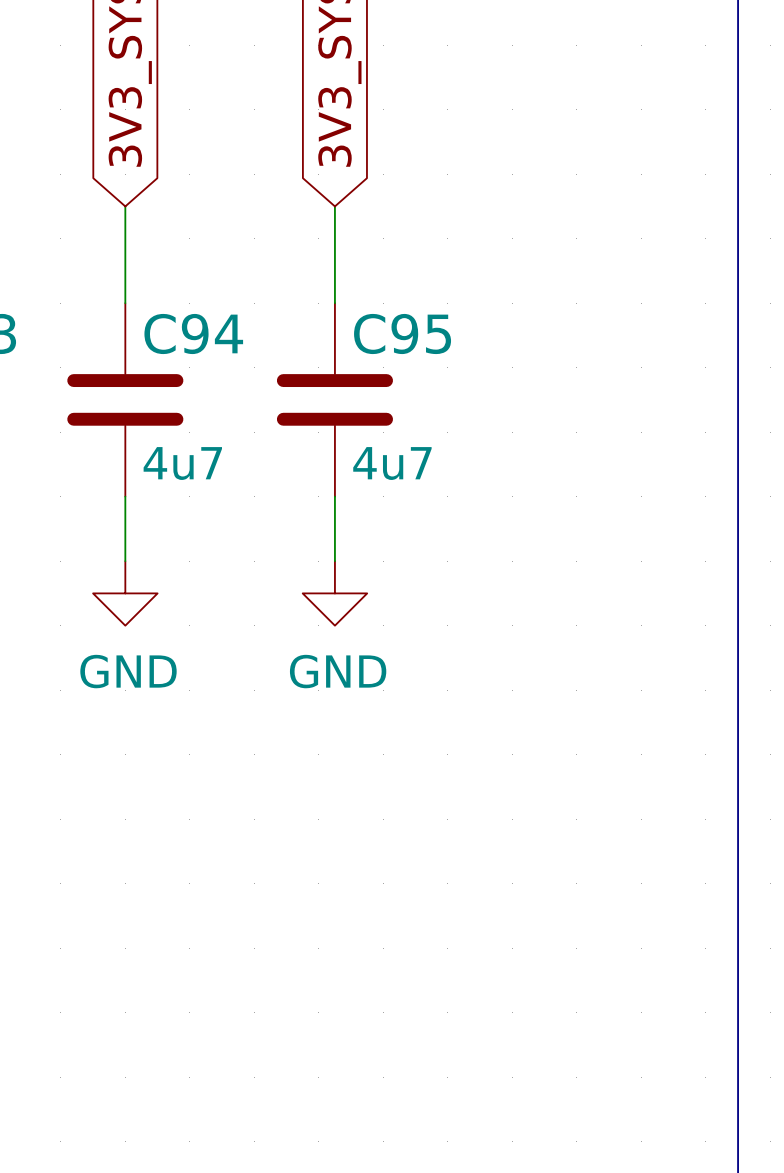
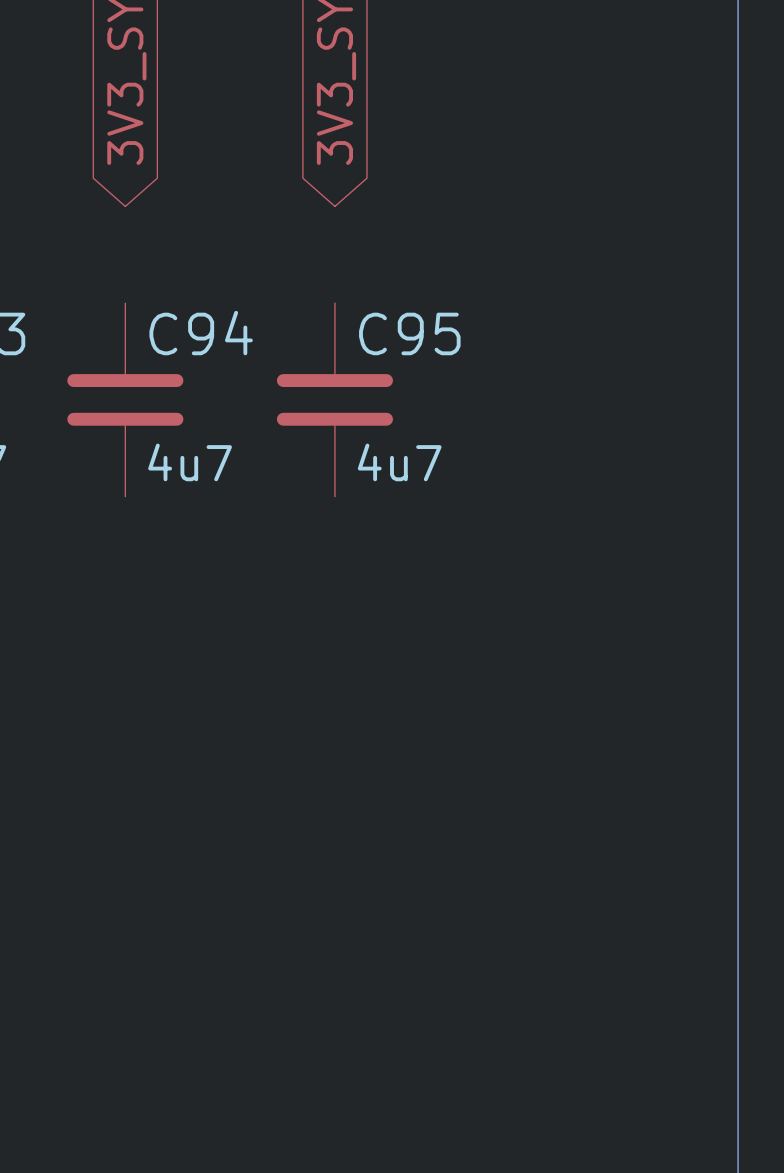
wire: (125, 206) (125, 303) -> none
wire: (334, 206) (334, 303) -> none
wire: (125, 496) (125, 561) -> none
wire: (334, 496) (334, 561) -> none
power symbol: GND (125, 593) -> none
power symbol: GND (334, 593) -> none

